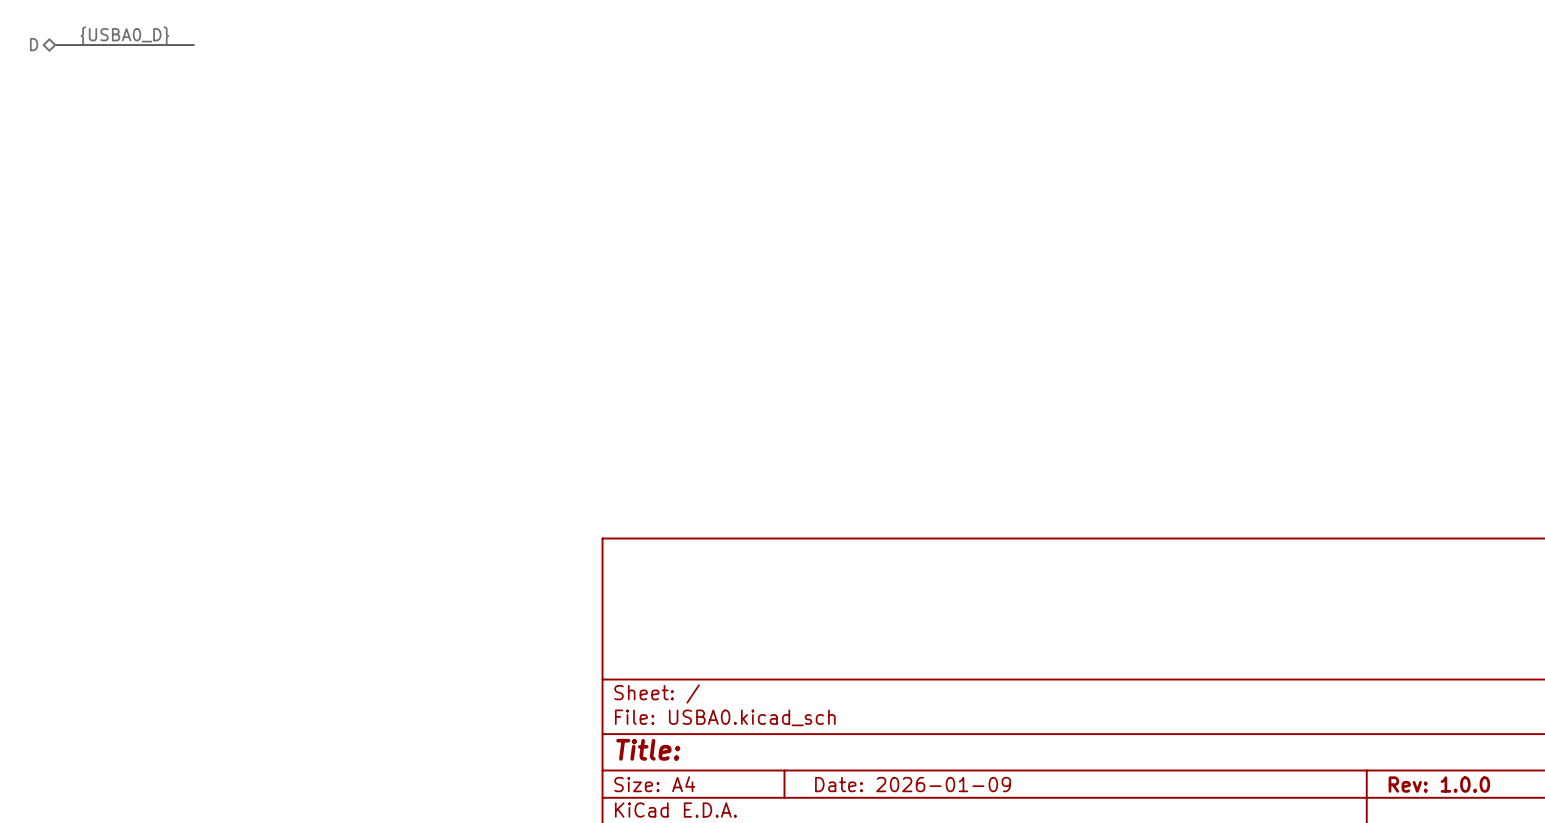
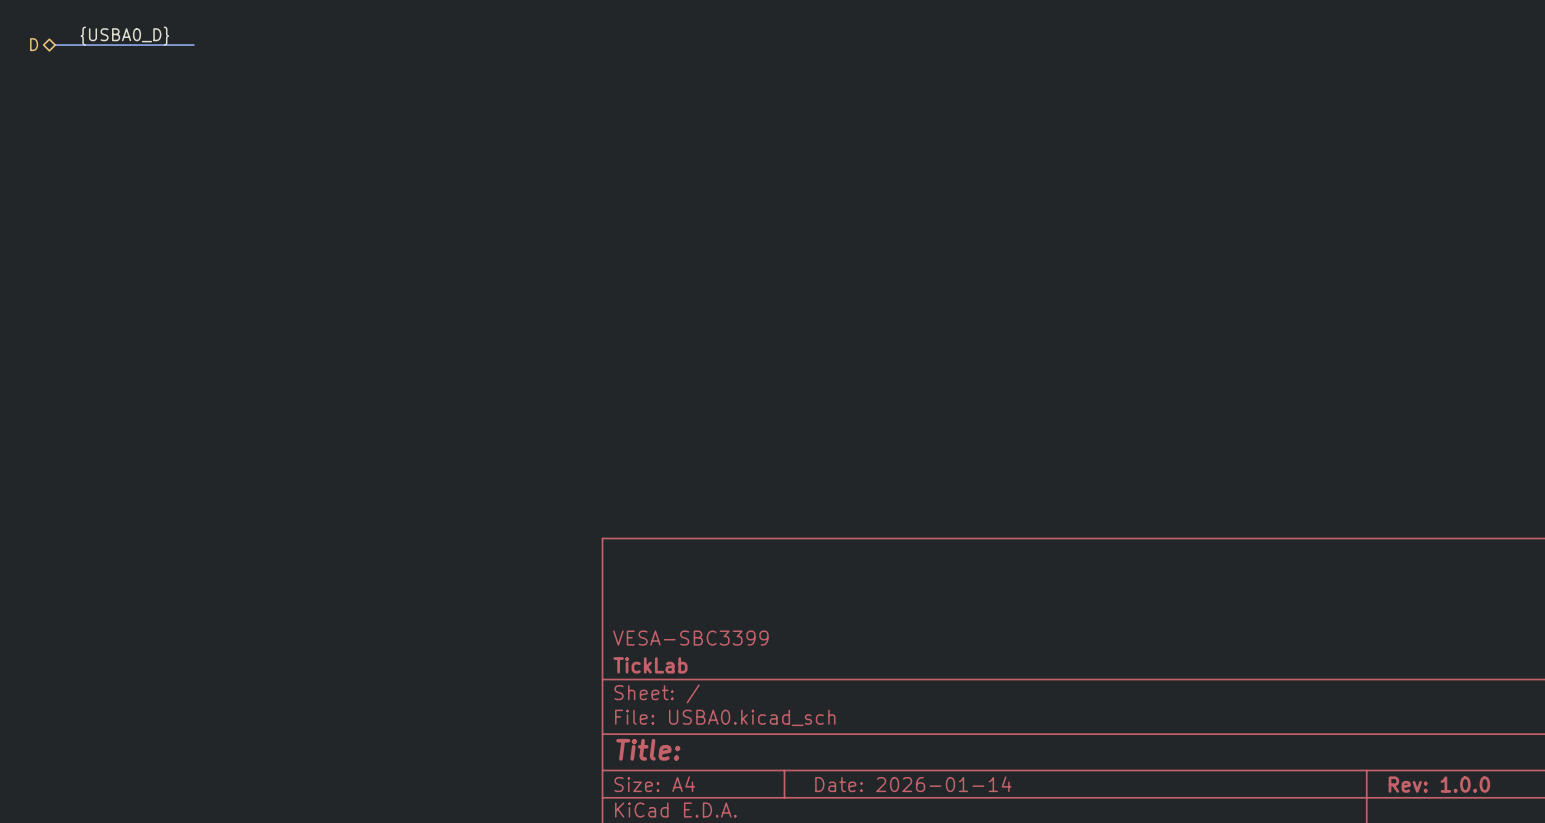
title block: none -> VESA-SBC3399 (690, 638)
title block: none -> TickLab (650, 665)
title block: Date: 2026-01-09 (913, 784) -> Date: 2026-01-14 (913, 784)

